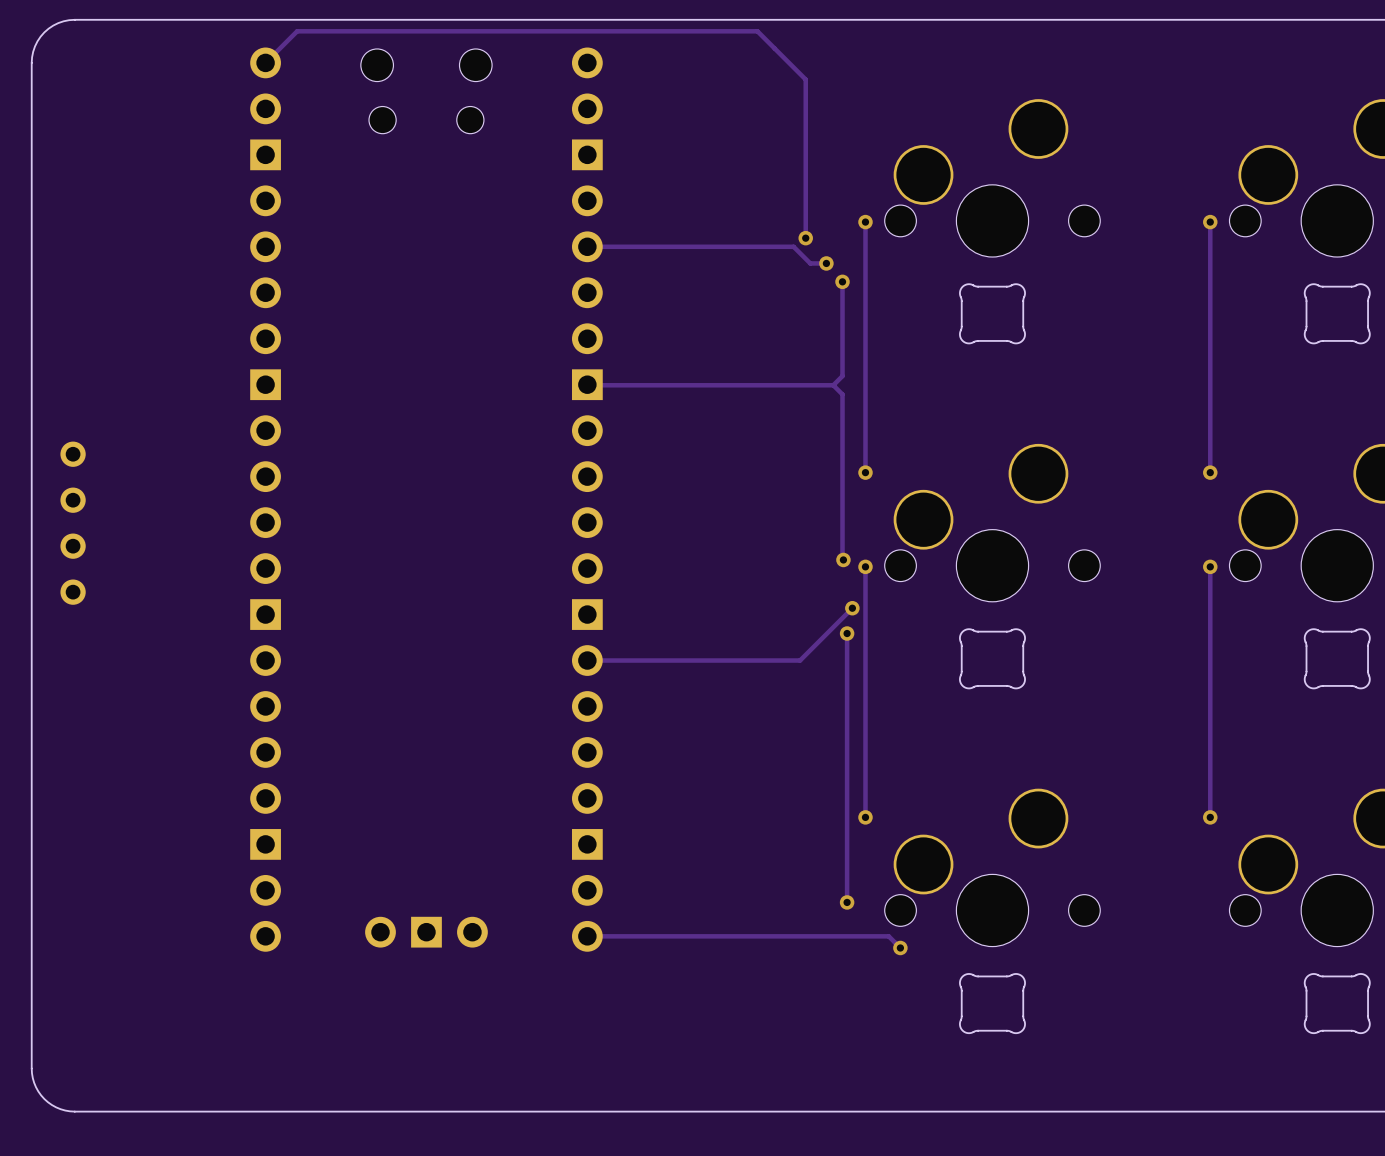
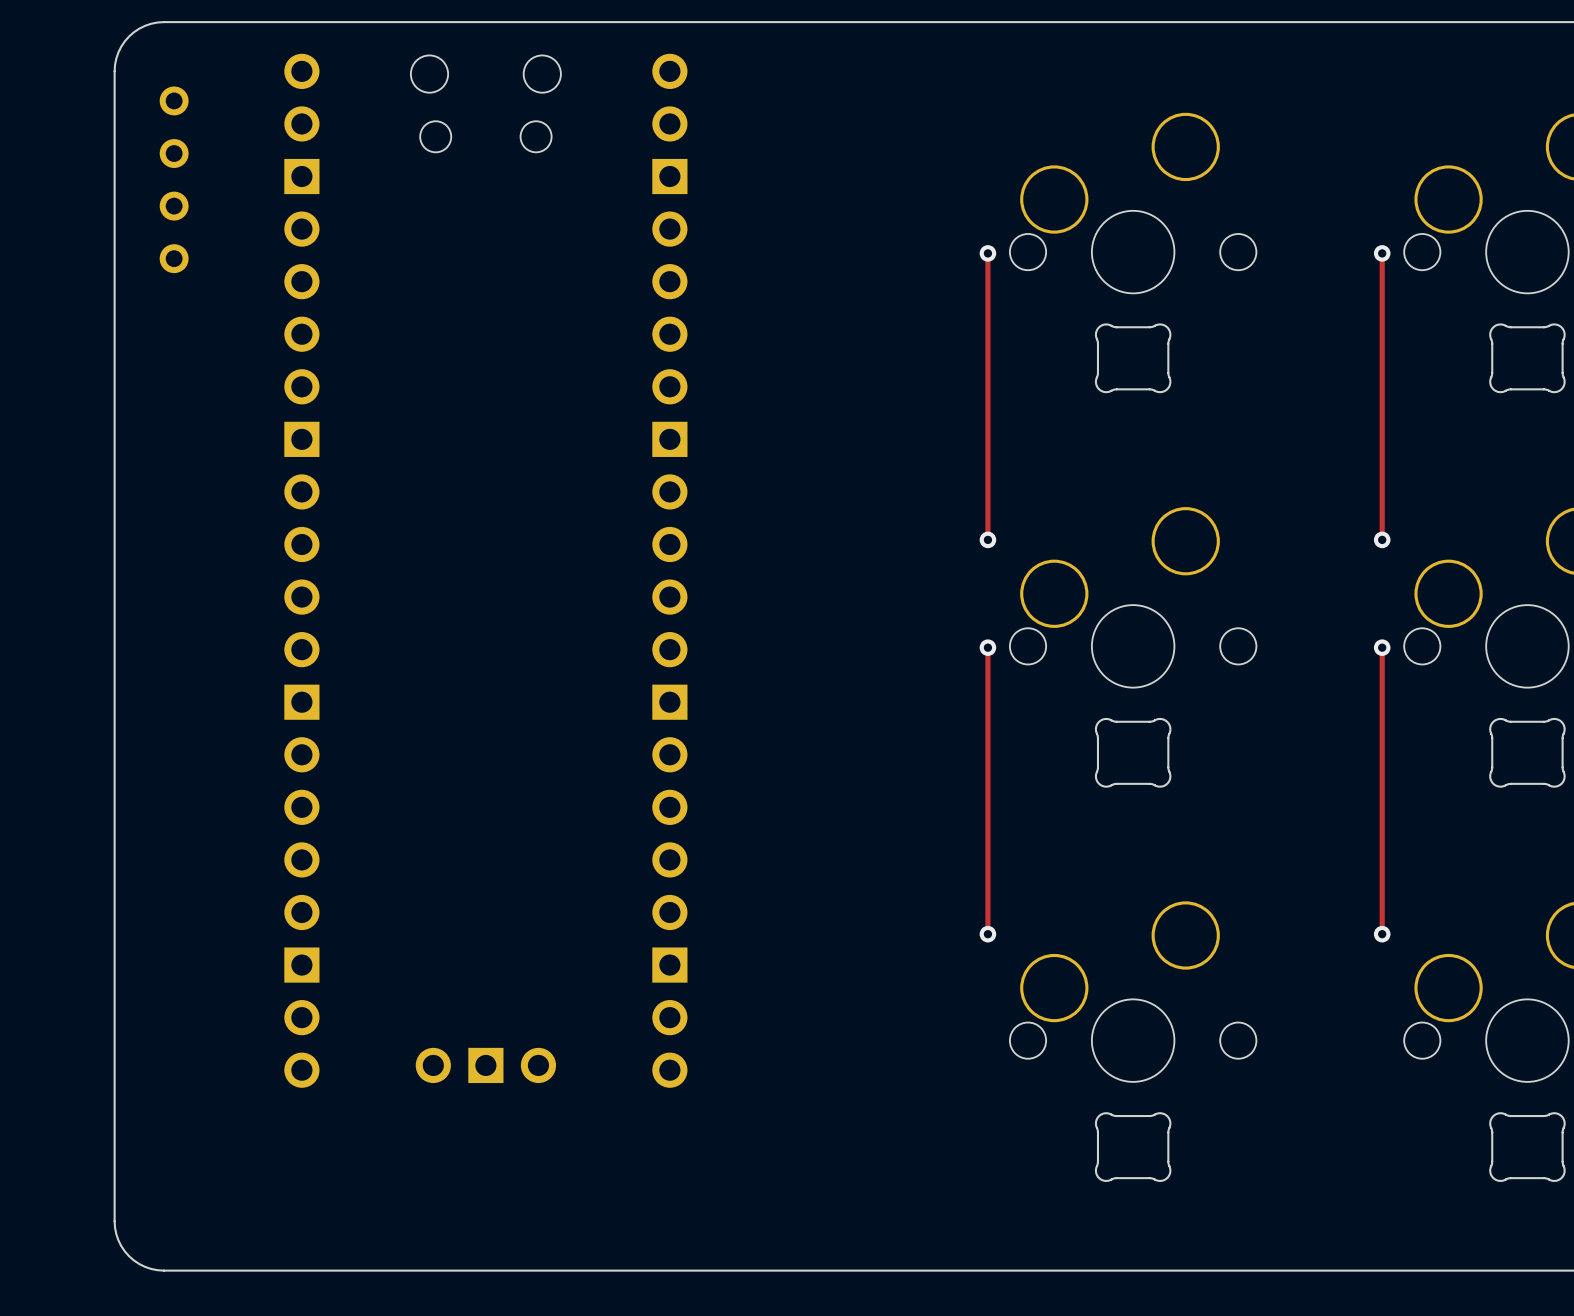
board edge: (144, 19) (74, 19) (58, 23) (40, 36) (35, 46) (31, 62) (31, 1073) (34, 1082) (41, 1095) (47, 1102) (60, 1109) (74, 1111) (144, 1111) -> (163, 22) (145, 25) (129, 36) (118, 52) (114, 71) (114, 1221) (118, 1240) (129, 1256) (145, 1266) (163, 1270)
track: (265, 62) (297, 31) (757, 31) (805, 79) (805, 238) -> none
via: (805, 238) -> none
track: (587, 246) (793, 246) (810, 263) (826, 263) -> none
via: (826, 263) -> none
track: (842, 281) (842, 376) (833, 385) -> none
via: (842, 281) -> none
track: (587, 385) (833, 385) -> none
track: (833, 385) (842, 394) (843, 559) -> none
part position: (73, 523) -> (174, 179)
via: (843, 559) -> none
track: (847, 608) (852, 608) (800, 660) (587, 660) -> none
via: (852, 608) -> none
track: (847, 633) (847, 902) -> none
via: (847, 633) -> none
via: (847, 902) -> none
track: (587, 936) (888, 936) (900, 947) -> none
via: (900, 947) -> none

